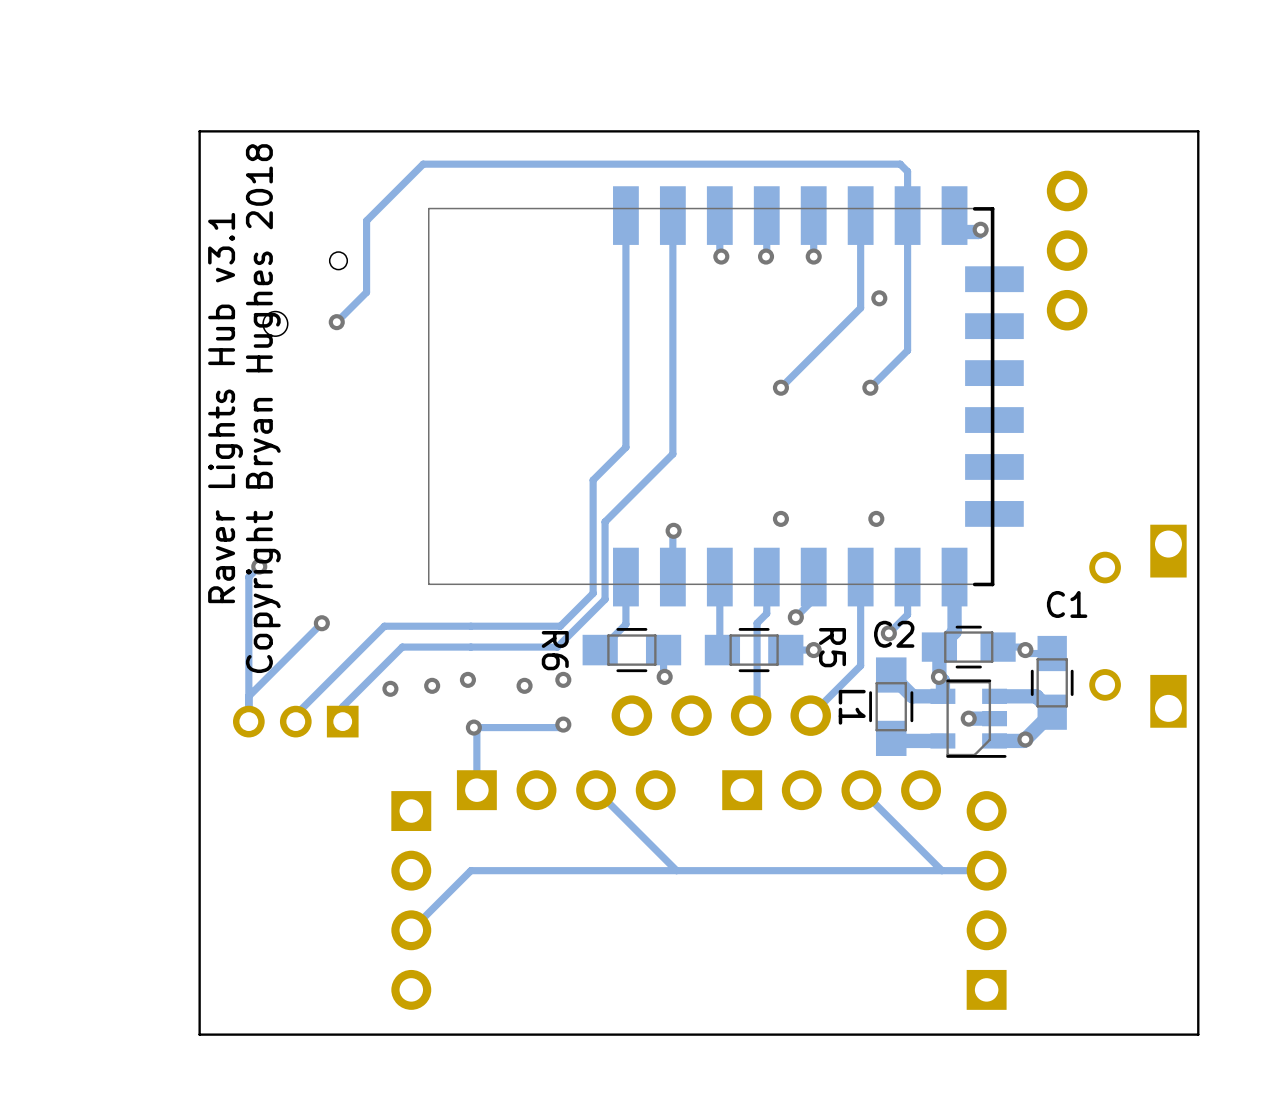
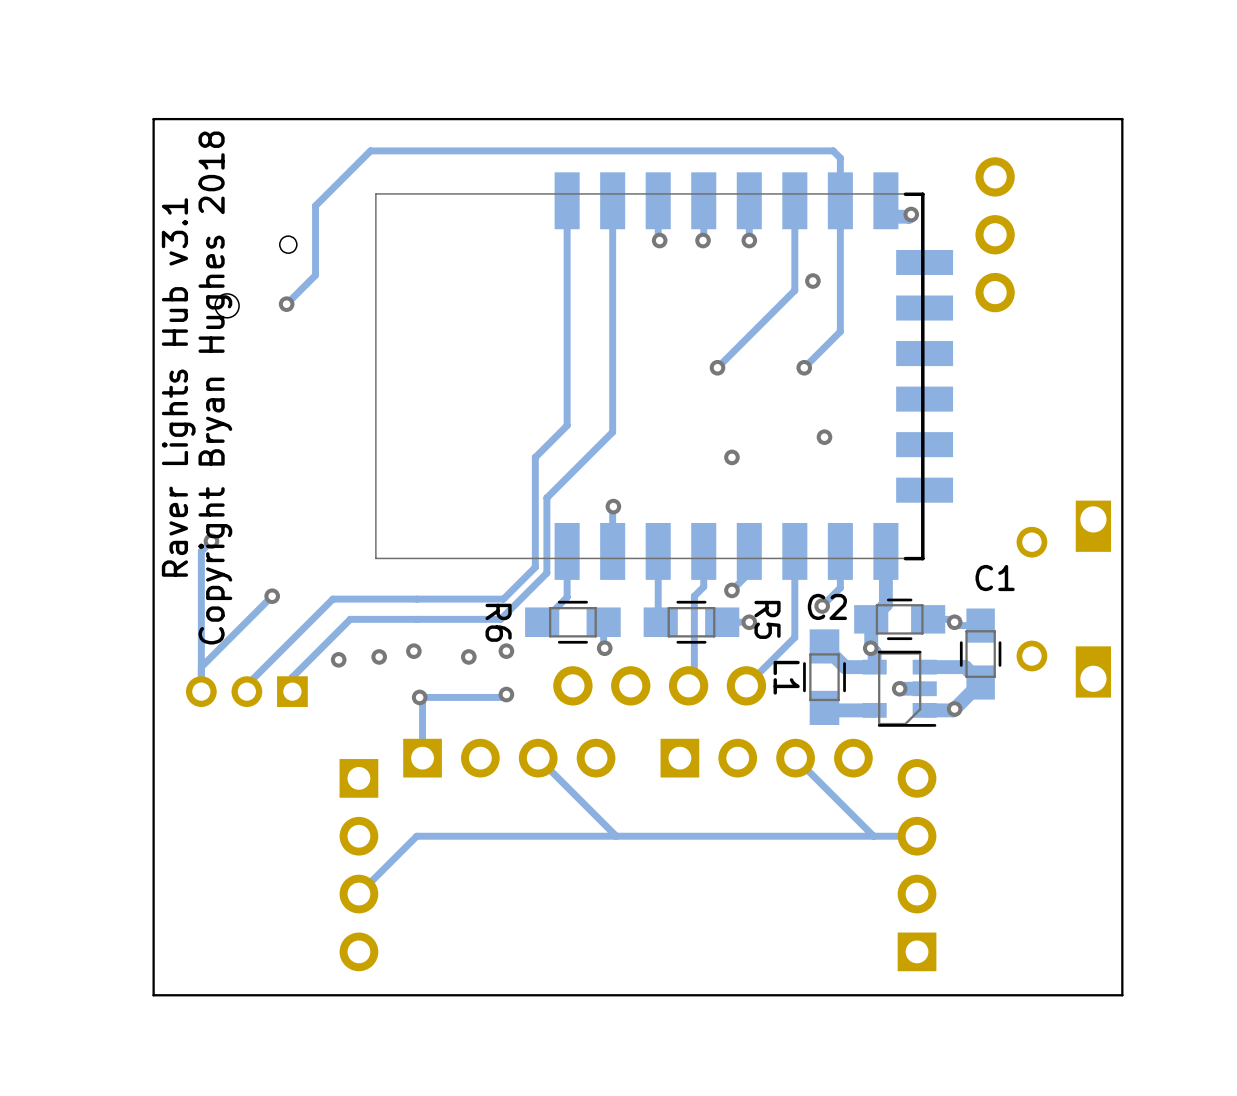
via: none -> (824, 437)
via position: (780, 518) -> (731, 457)
via: (876, 518) -> none

